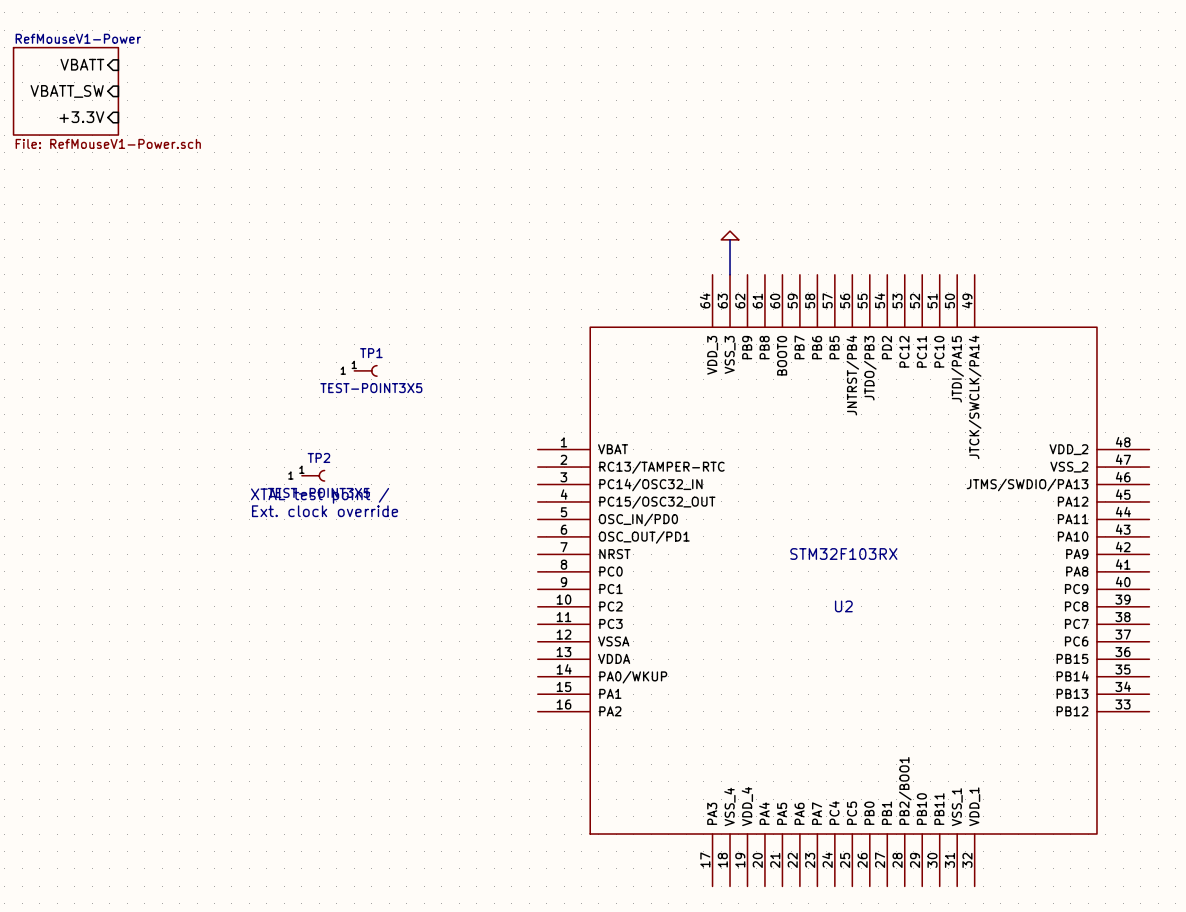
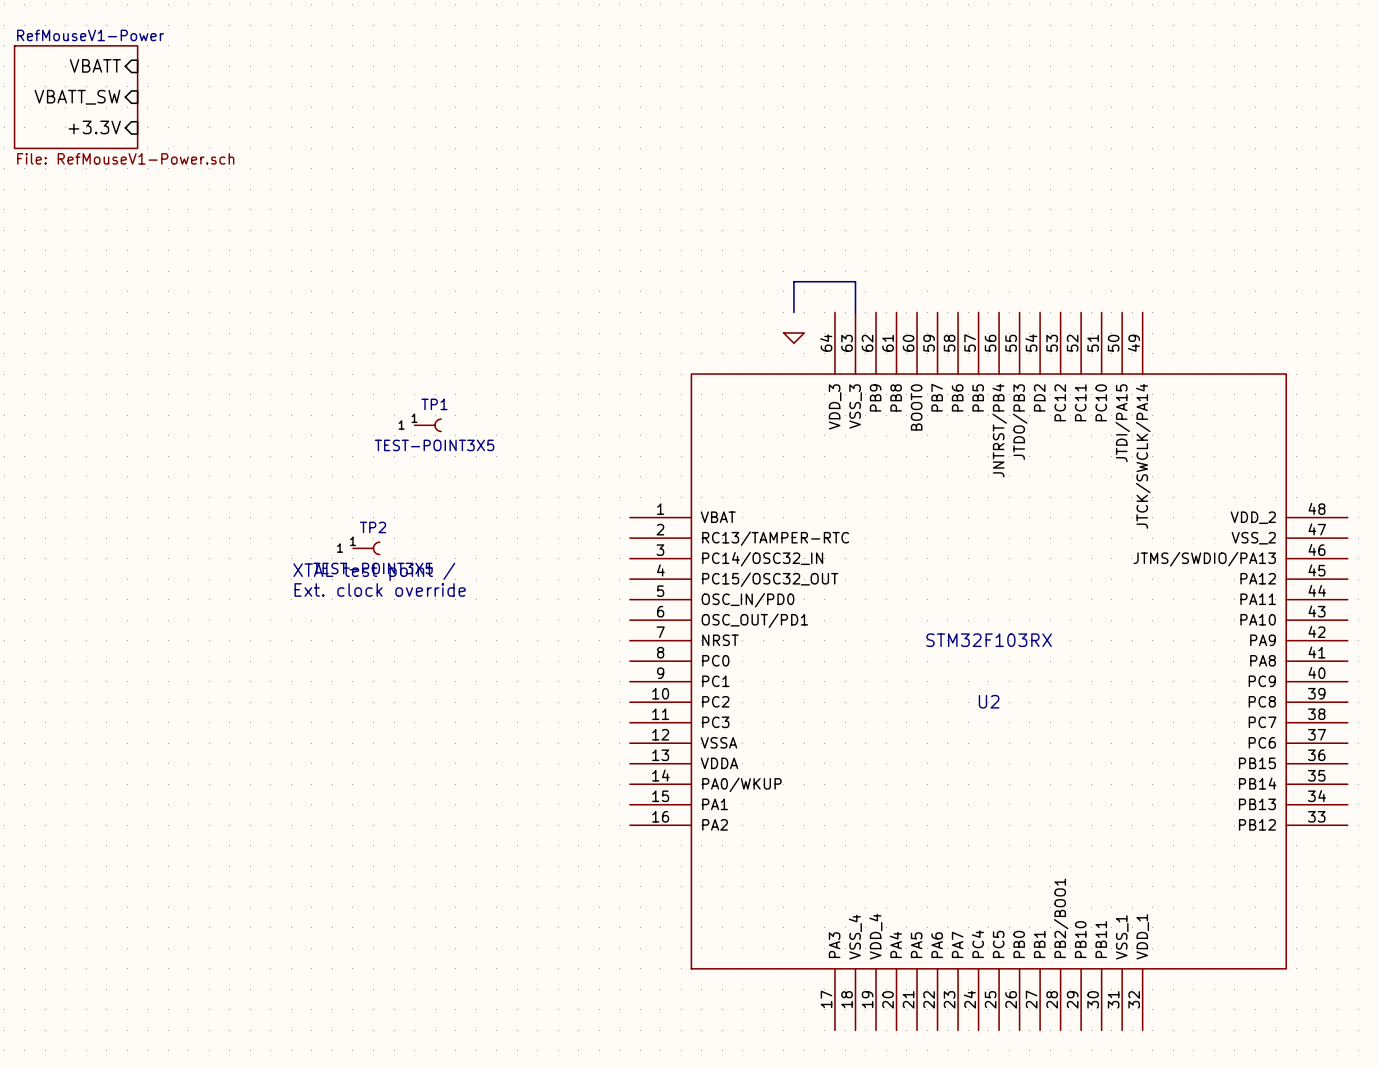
power symbol rotation: 0° (730, 235) -> 180° (793, 338)
power symbol position: (730, 235) -> (793, 338)
wire: (730, 239) (730, 248) -> (793, 312) (793, 281) (855, 281)

